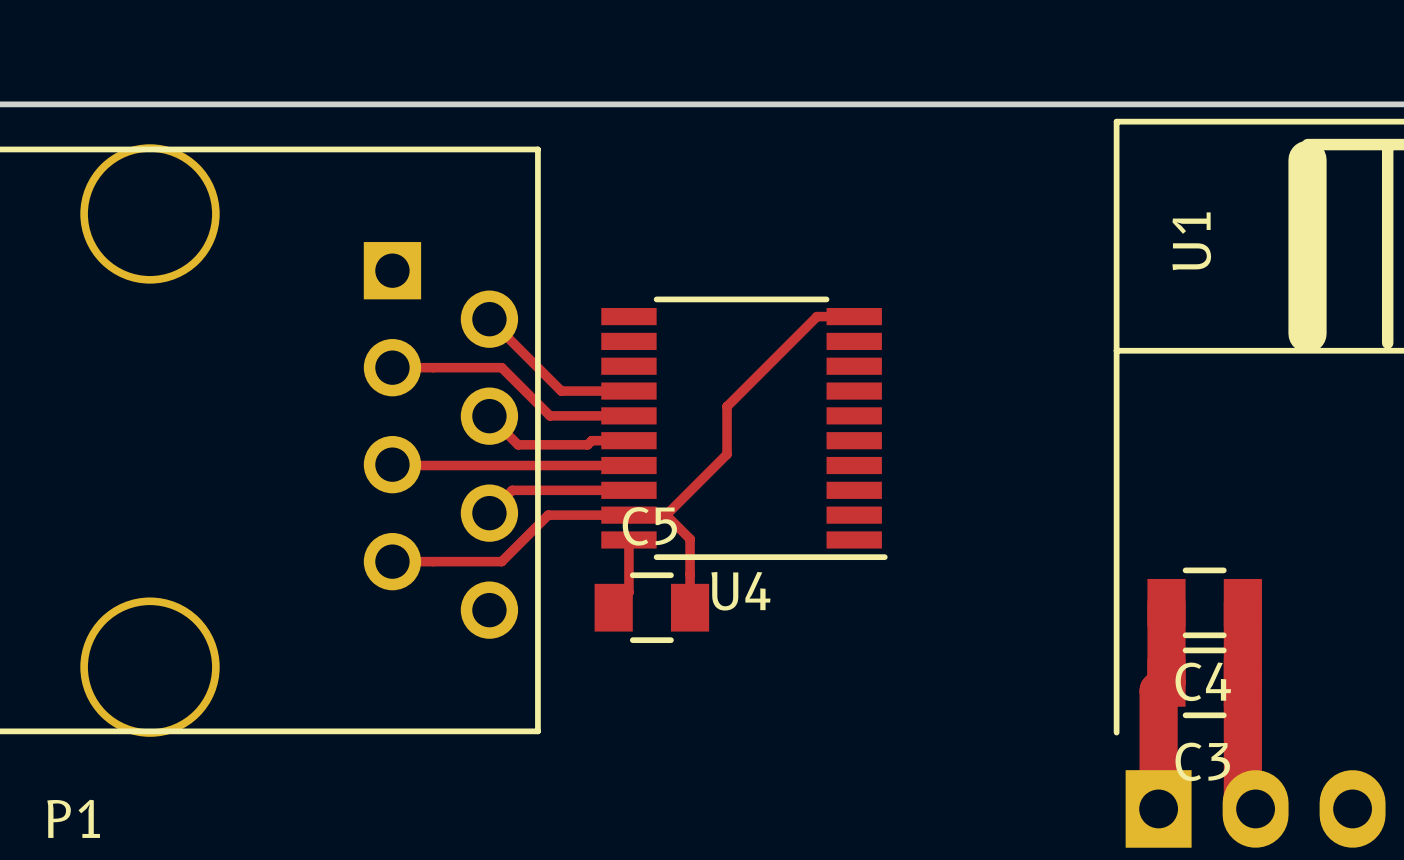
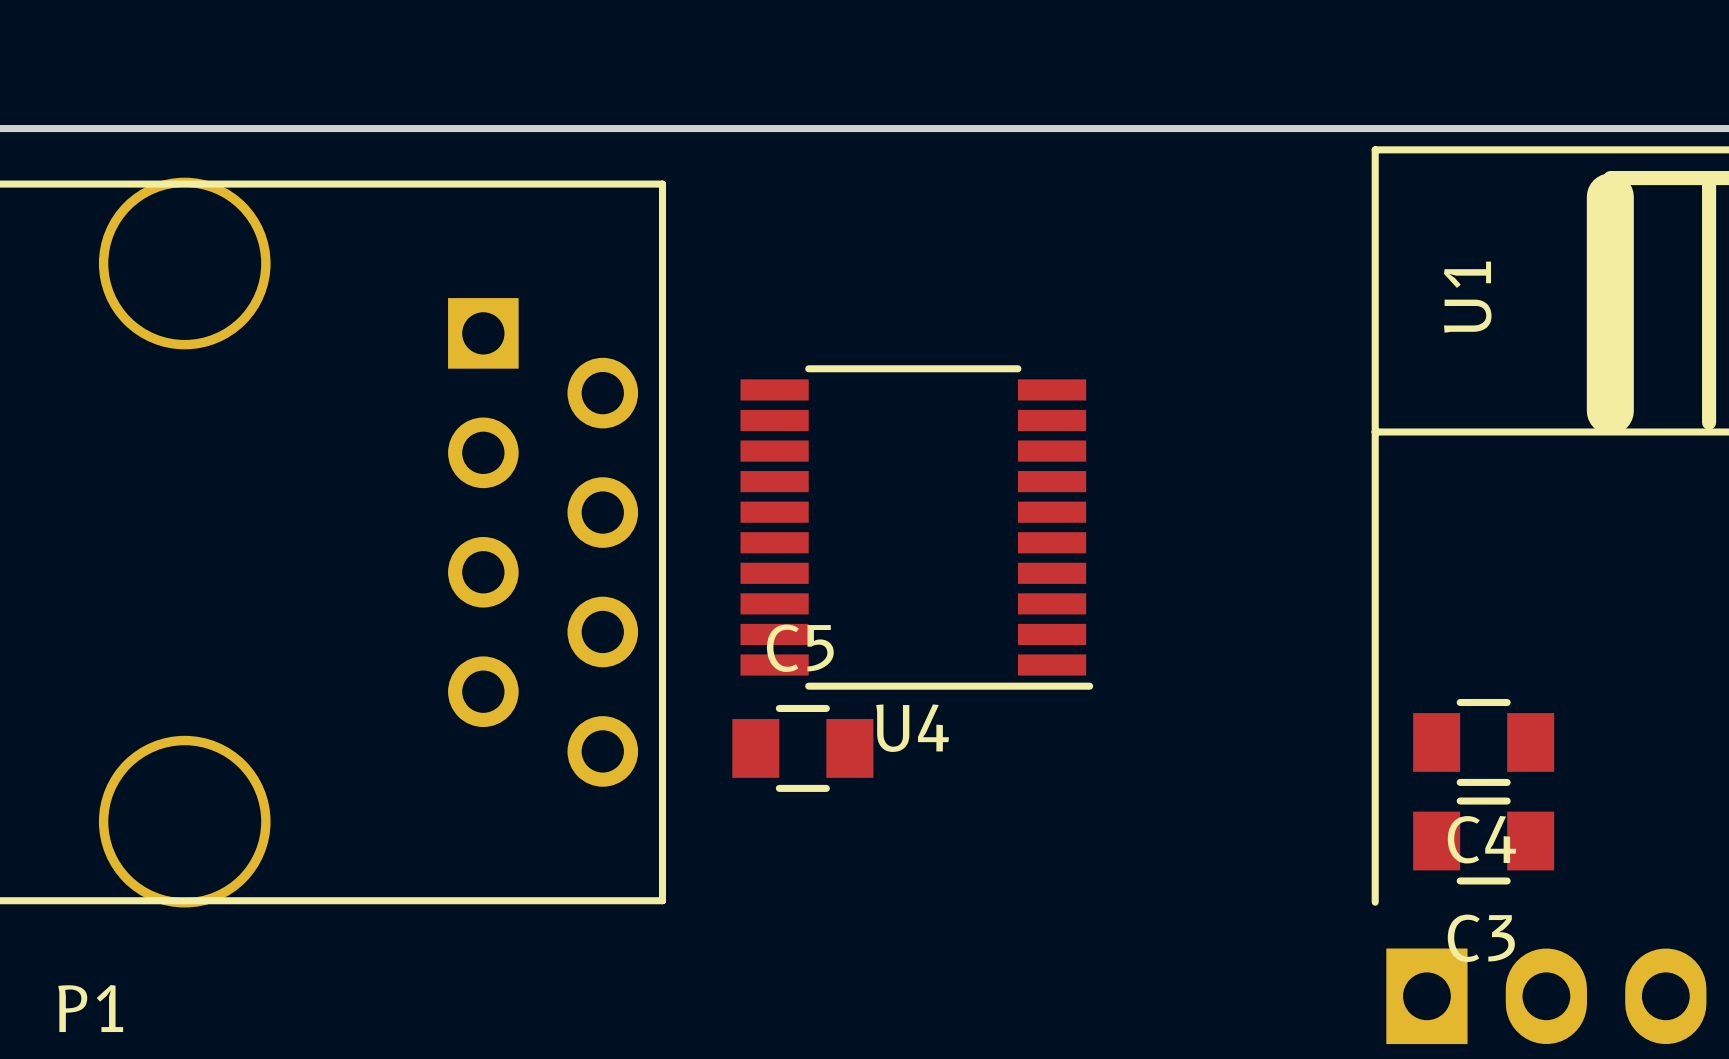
track: (854, 316) (817, 316) (727, 406) (727, 454) (666, 515) -> none
track: (489, 319) (561, 391) (628, 391) -> none
track: (392, 367) (501, 367) (549, 415) (628, 415) -> none
track: (489, 416) (518, 444) (587, 444) (591, 440) (628, 440) -> none
track: (392, 464) (628, 465) -> none
track: (628, 490) (512, 490) (489, 513) -> none
track: (666, 515) (548, 515) (501, 561) (392, 561) -> none
track: (666, 515) (690, 539) (690, 607) -> none
track: (628, 539) (628, 592) (613, 607) -> none
track: (1166, 602) (1166, 682) (1158, 690) (1158, 808) -> none
track: (1242, 602) (1242, 796) (1255, 808) -> none

